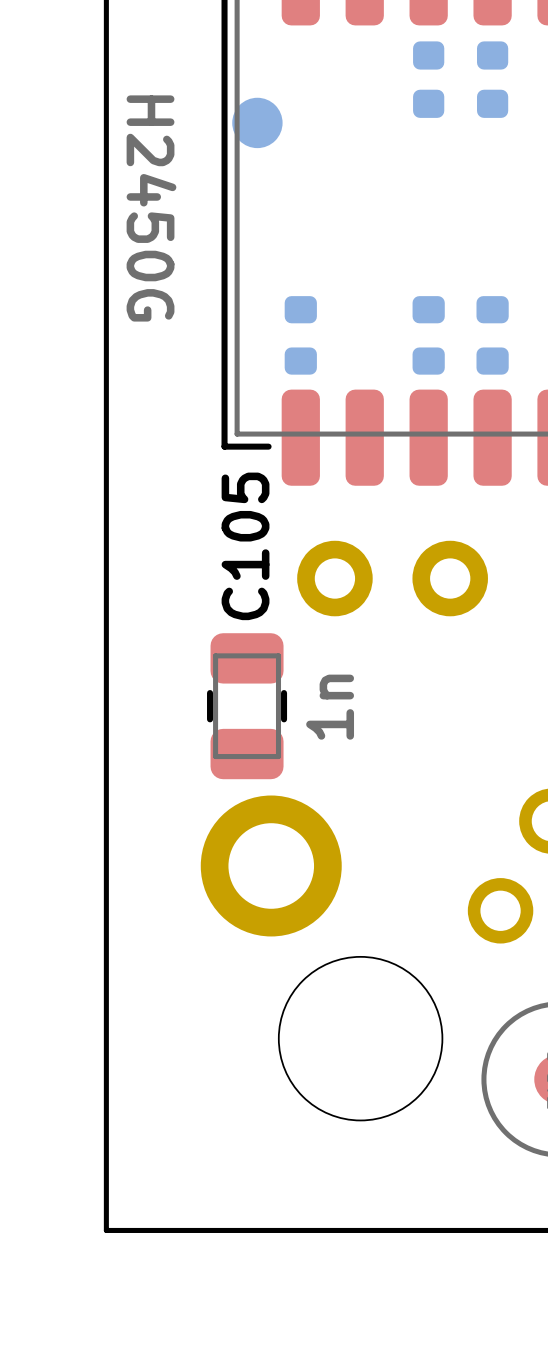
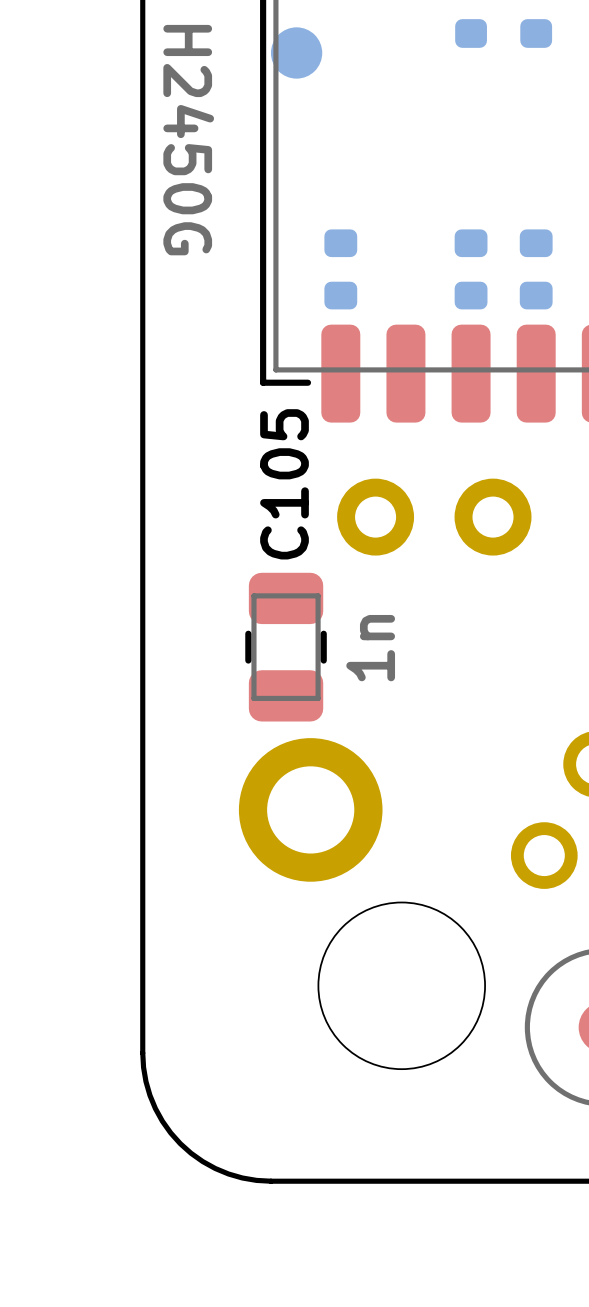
board edge: (106, 1104) (106, 1230) (232, 1230) -> (142, 1053) (145, 1081) (149, 1095) (162, 1121) (180, 1143) (202, 1161) (215, 1168) (242, 1178) (270, 1181)

